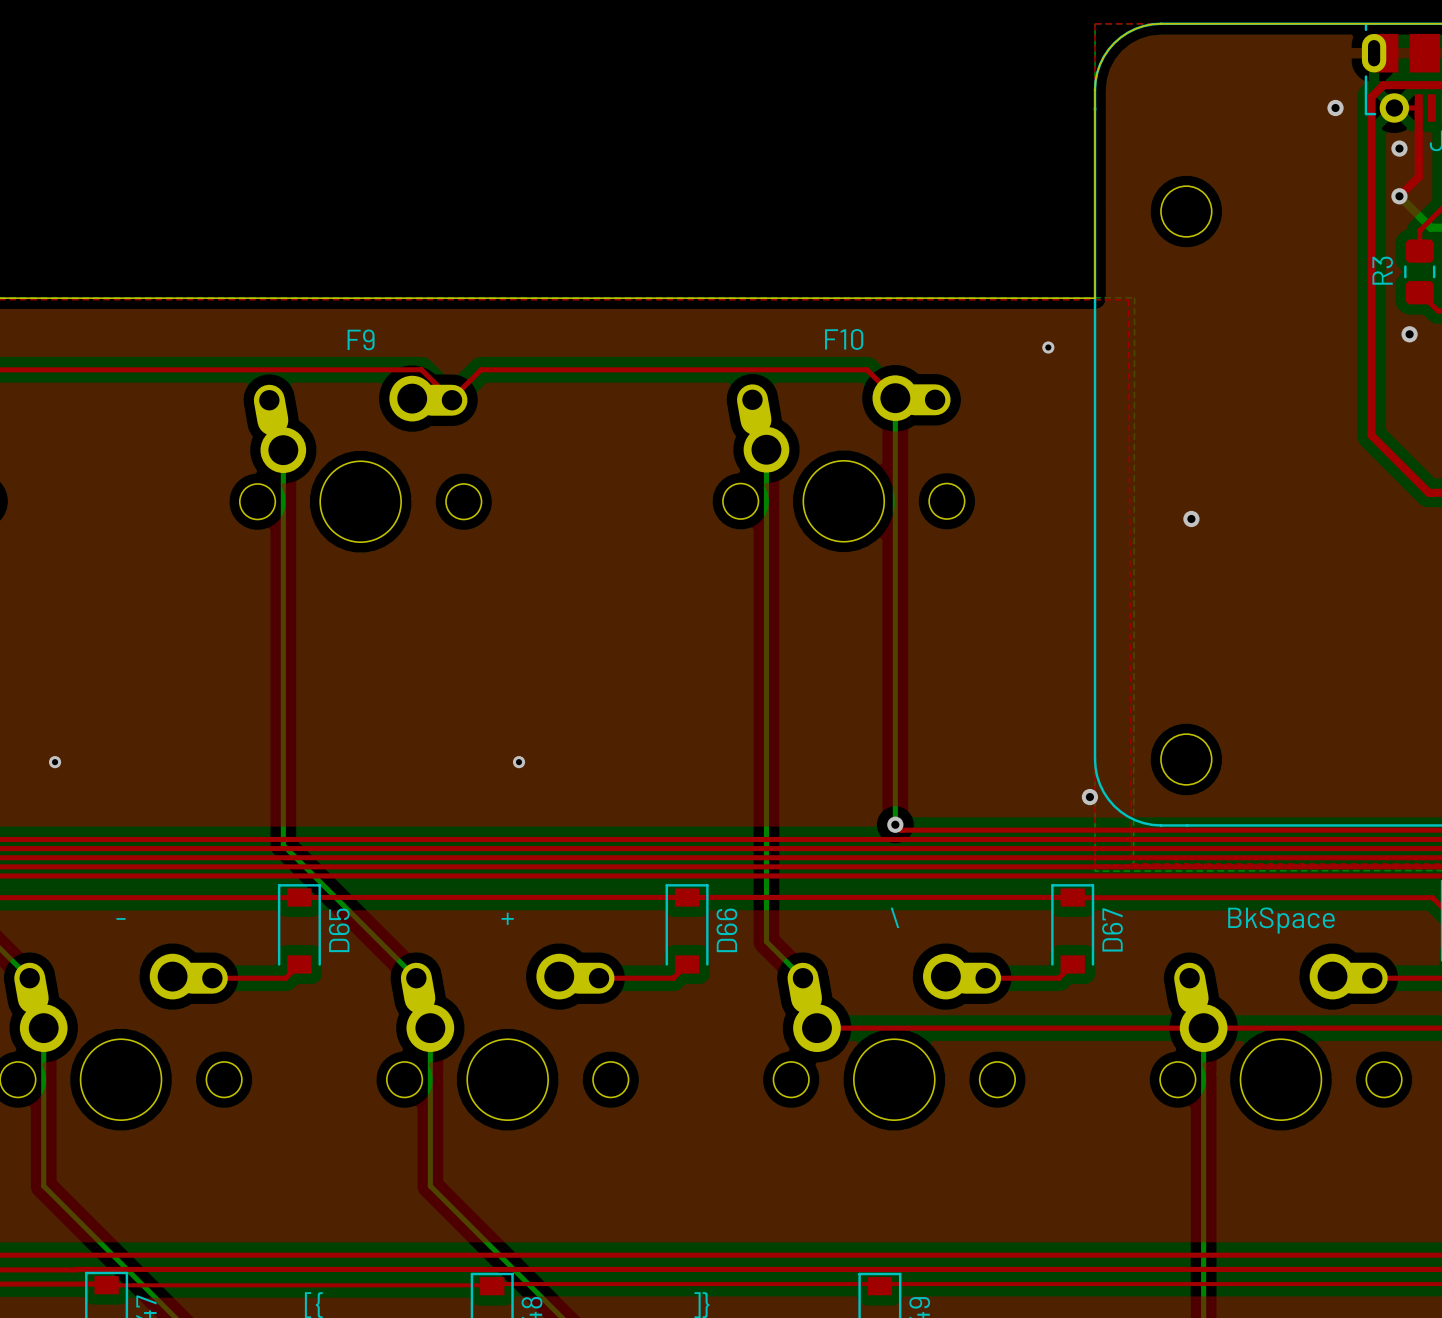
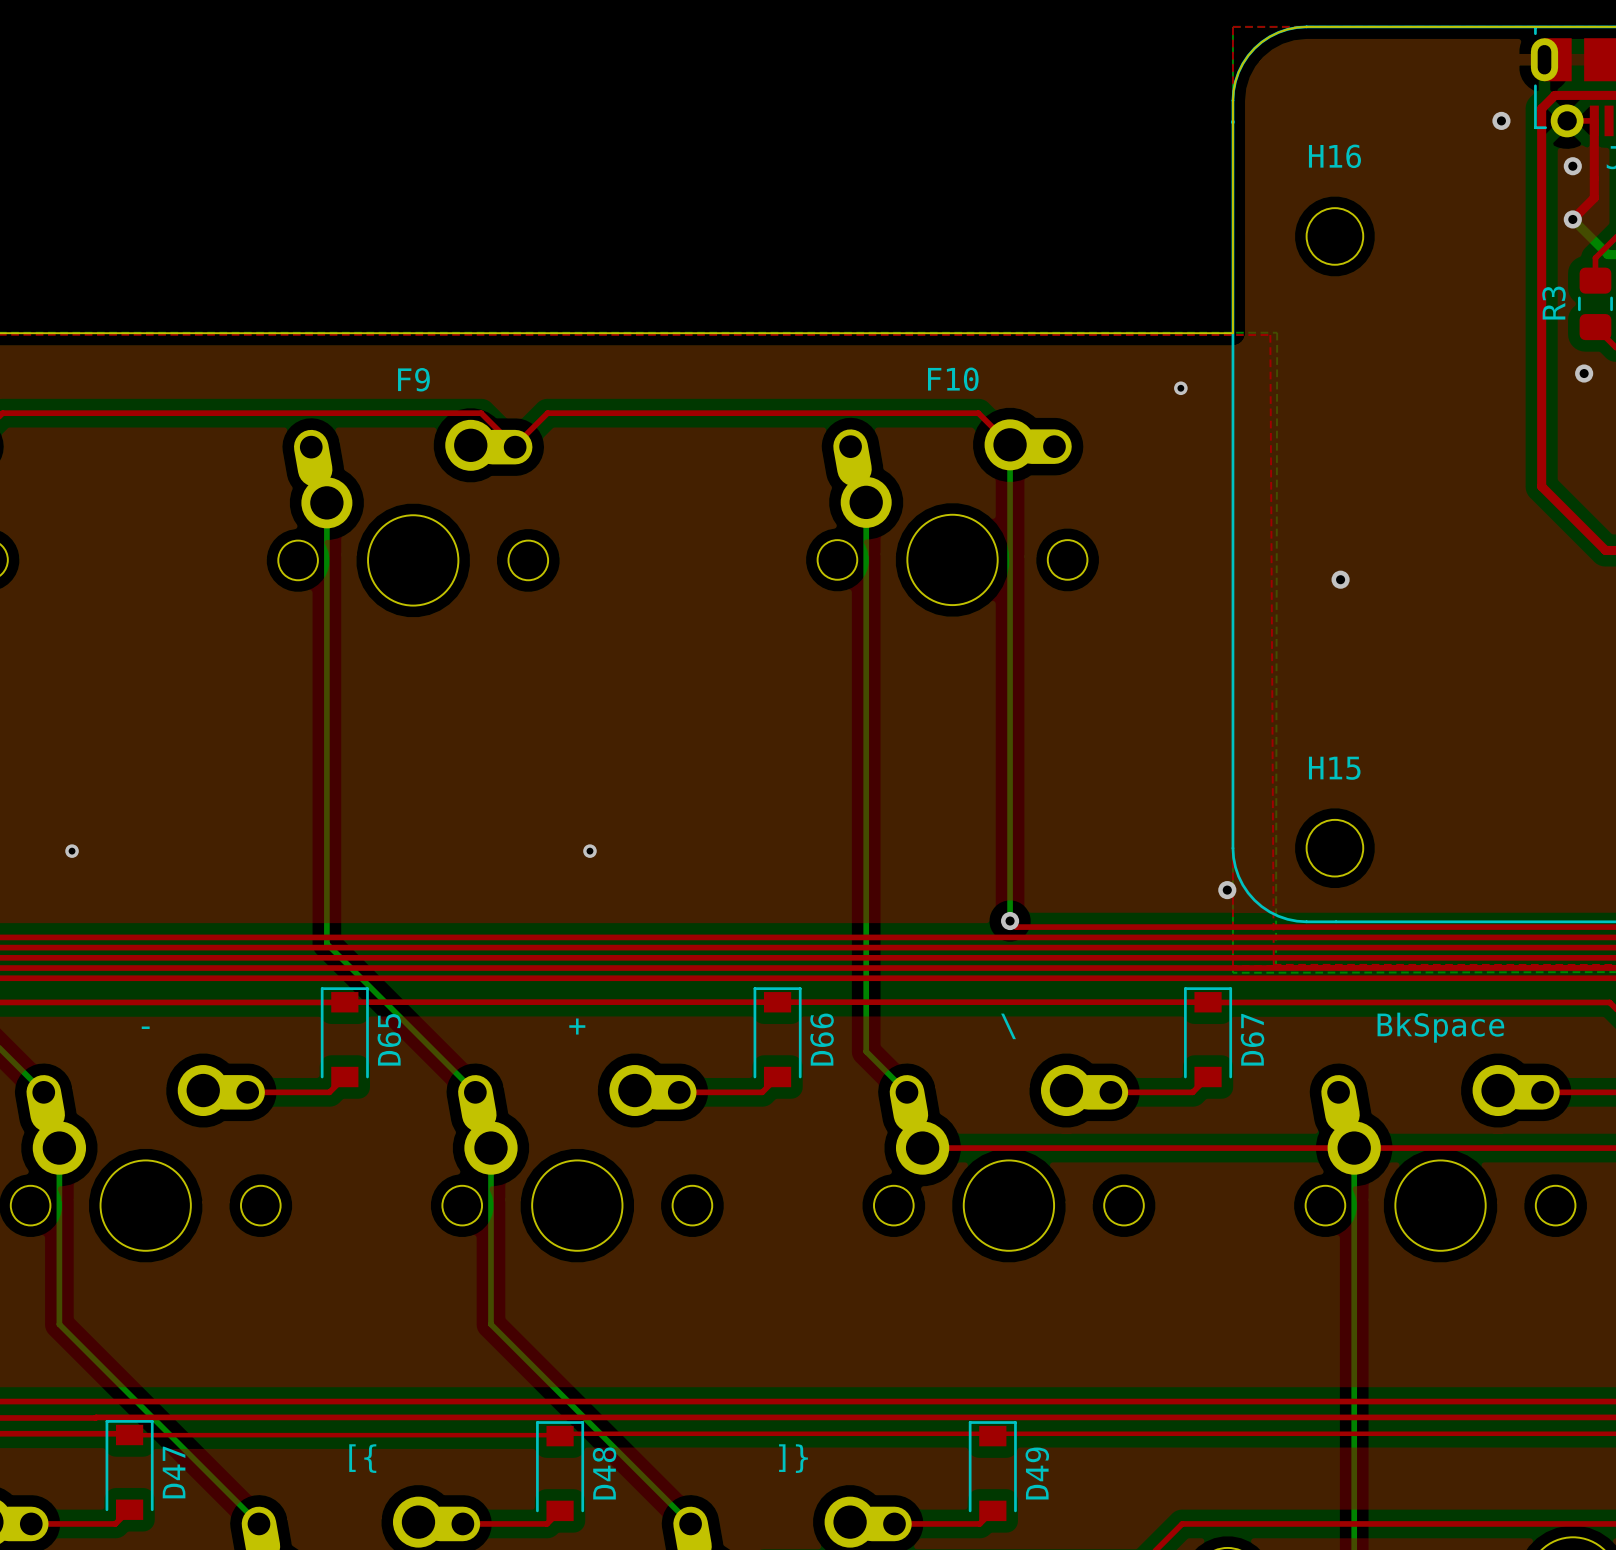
H16 name: none -> H16 (1334, 156)
H15 name: none -> H15 (1334, 768)

